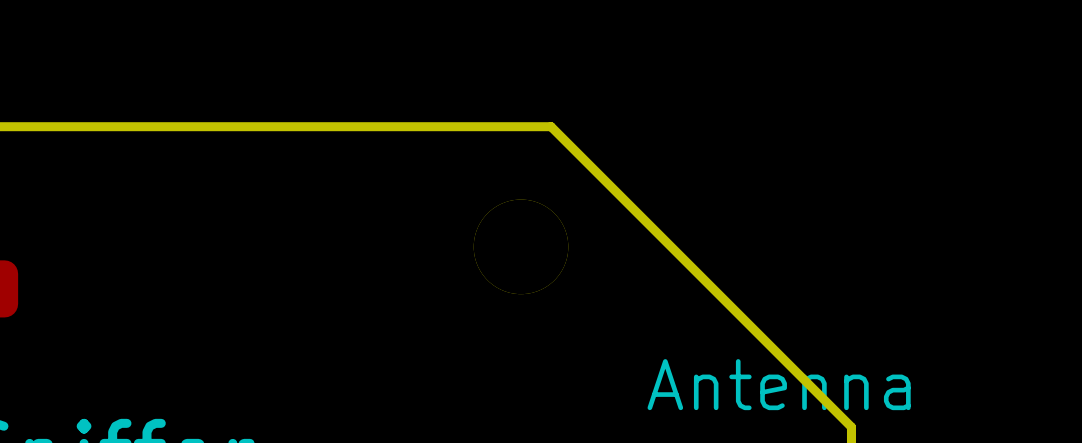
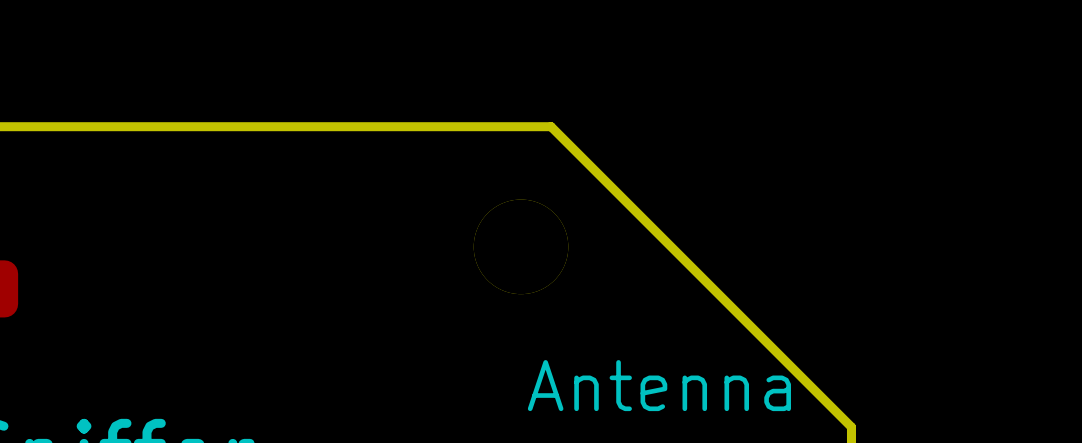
part value position: Antenna (779, 384) -> Antenna (659, 385)

